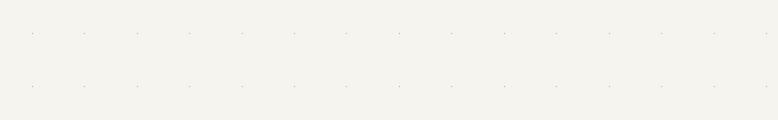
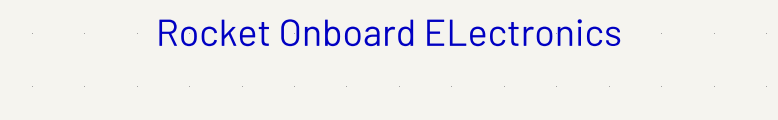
text: none -> Rocket Onboard ELectronics (389, 32)

